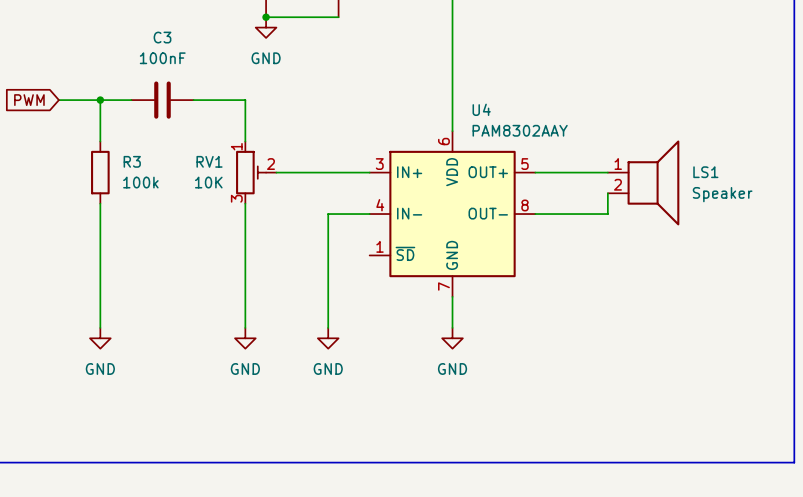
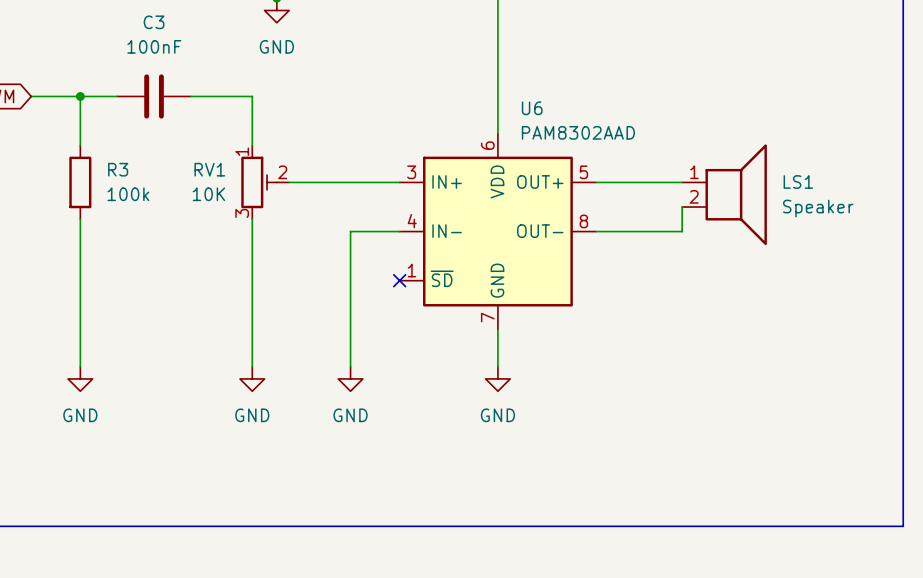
U4 name: U4 (481, 109) -> U6 (532, 108)
U4 value: PAM8302AAY (520, 130) -> PAM8302AAD (578, 132)
no-connect mark: none -> (399, 280)

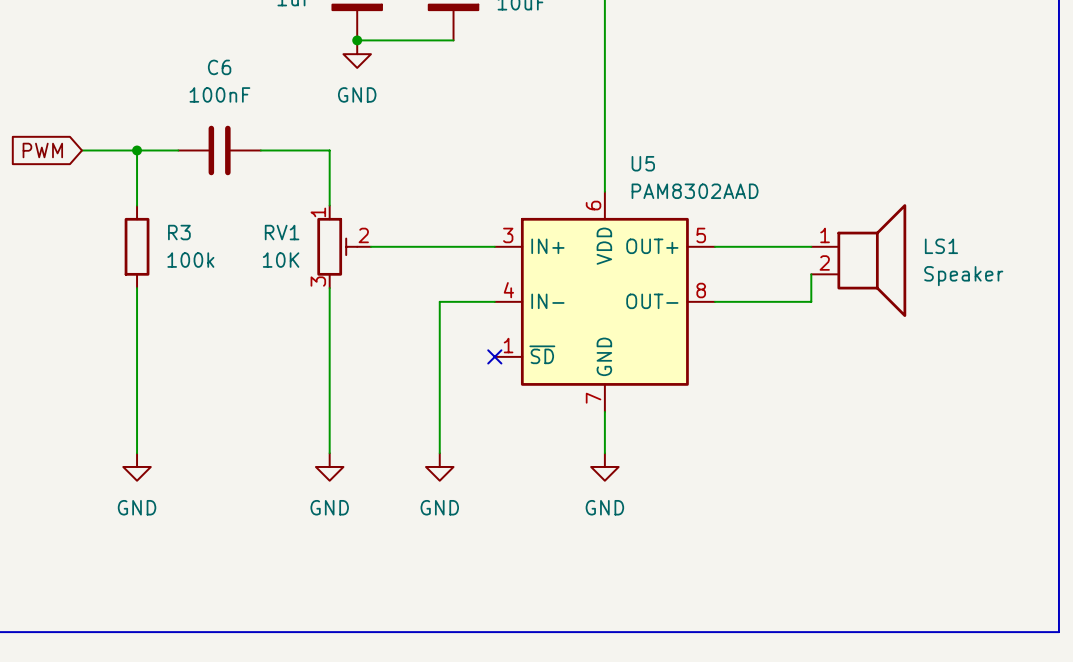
C3 name: C3 (154, 22) -> C6 (219, 67)
U6 name: U6 (532, 108) -> U5 (643, 163)

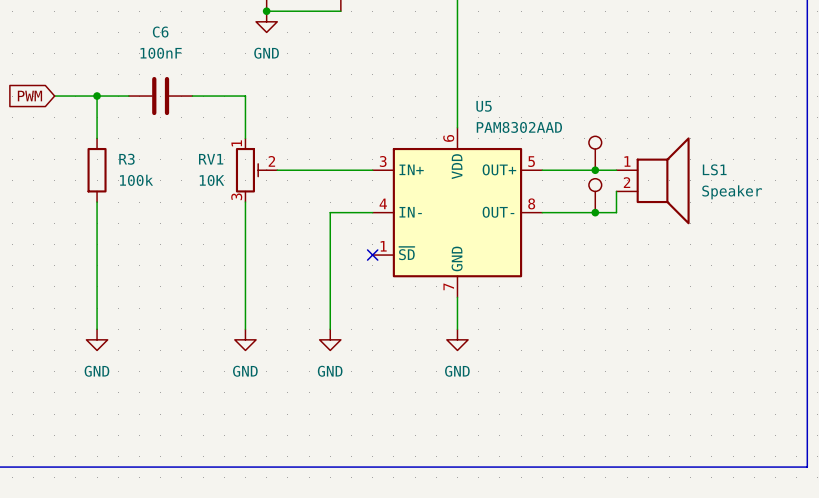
part: none -> (595, 153)
junction: none -> (595, 170)
part: none -> (595, 195)
junction: none -> (595, 212)

